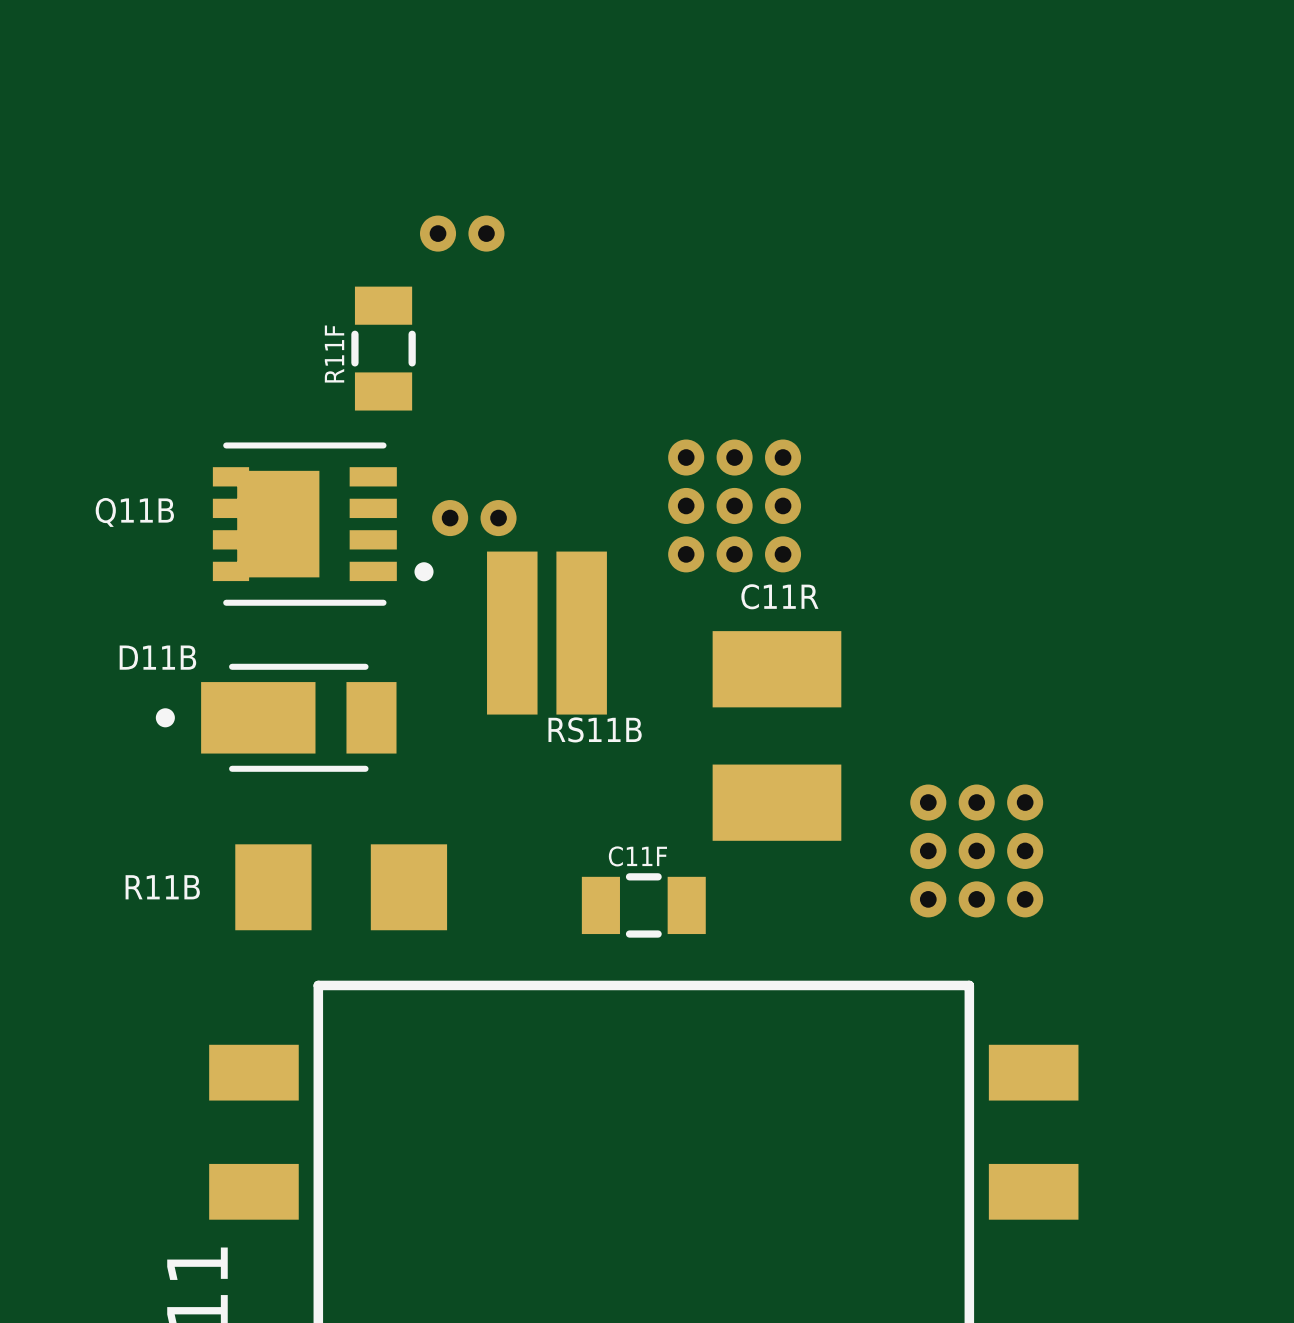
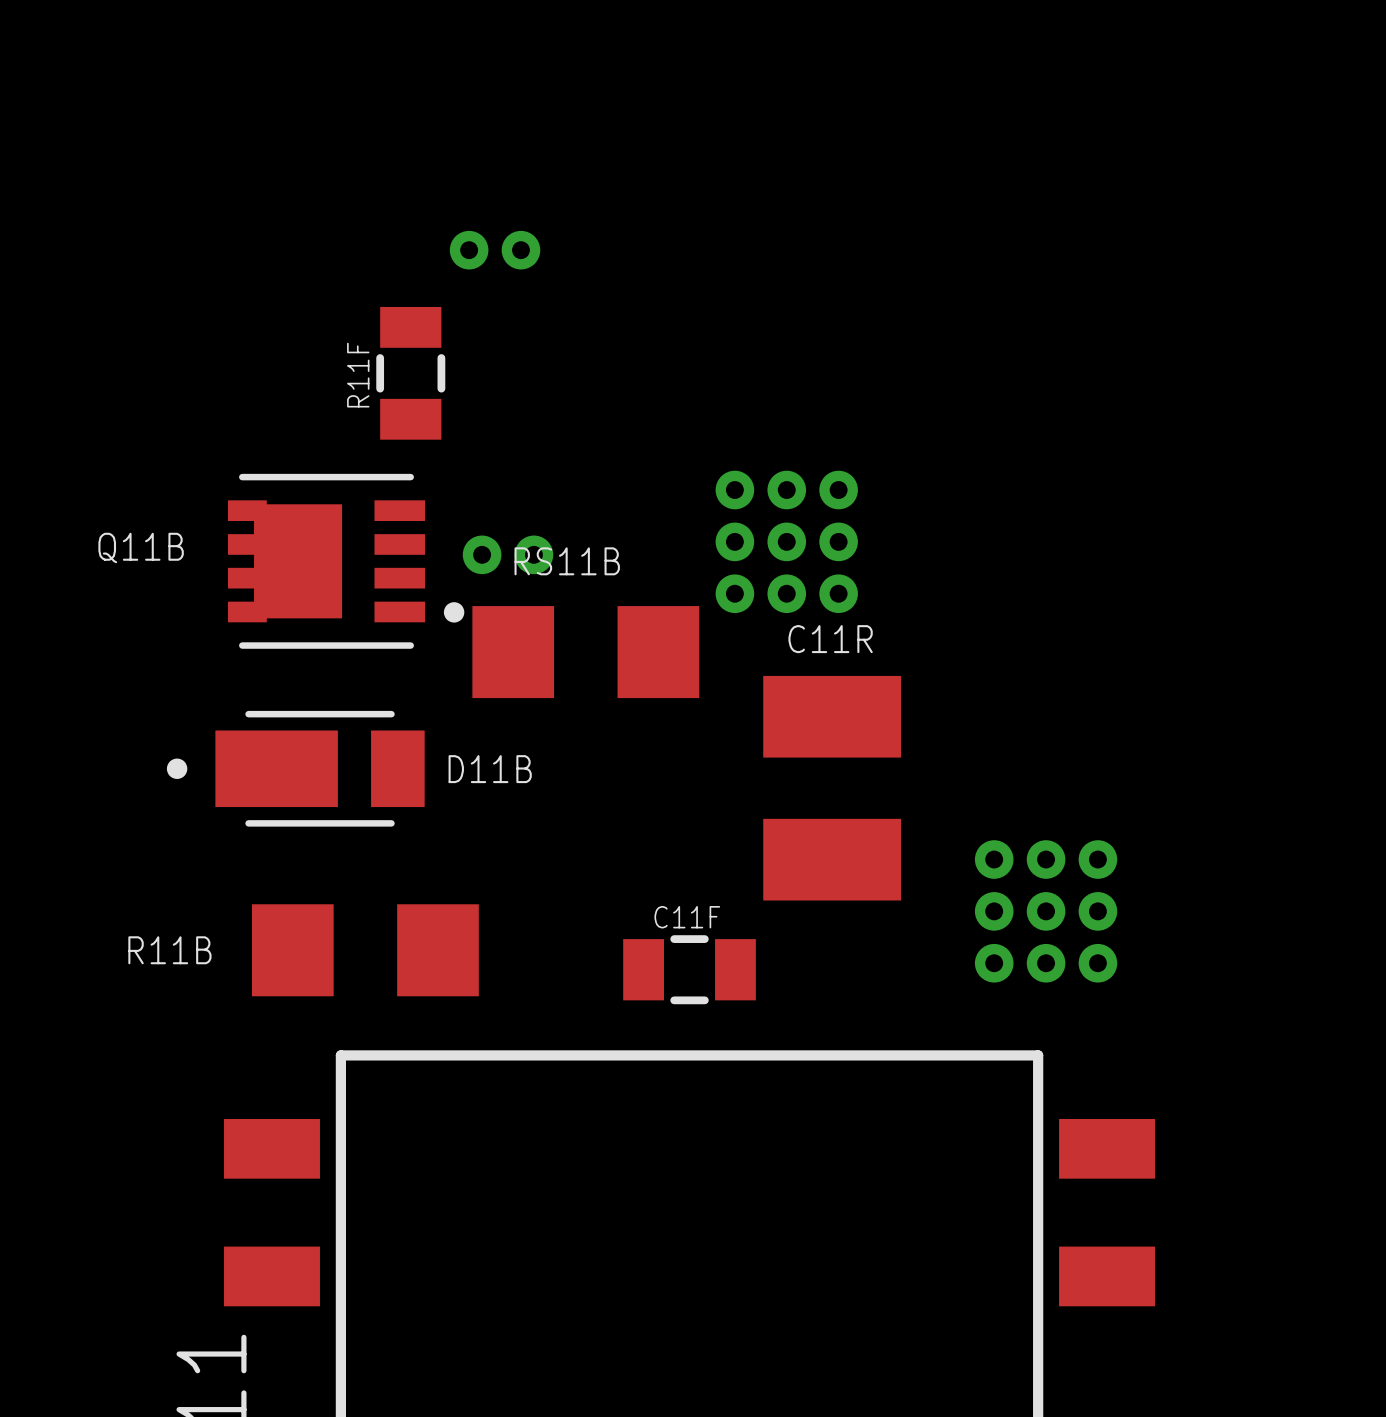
RS11B footprint: [487, 551, 607, 715] -> [472, 606, 700, 699]
D11B name position: D11B (157, 657) -> D11B (490, 769)
RS11B name position: RS11B (595, 729) -> RS11B (567, 561)

